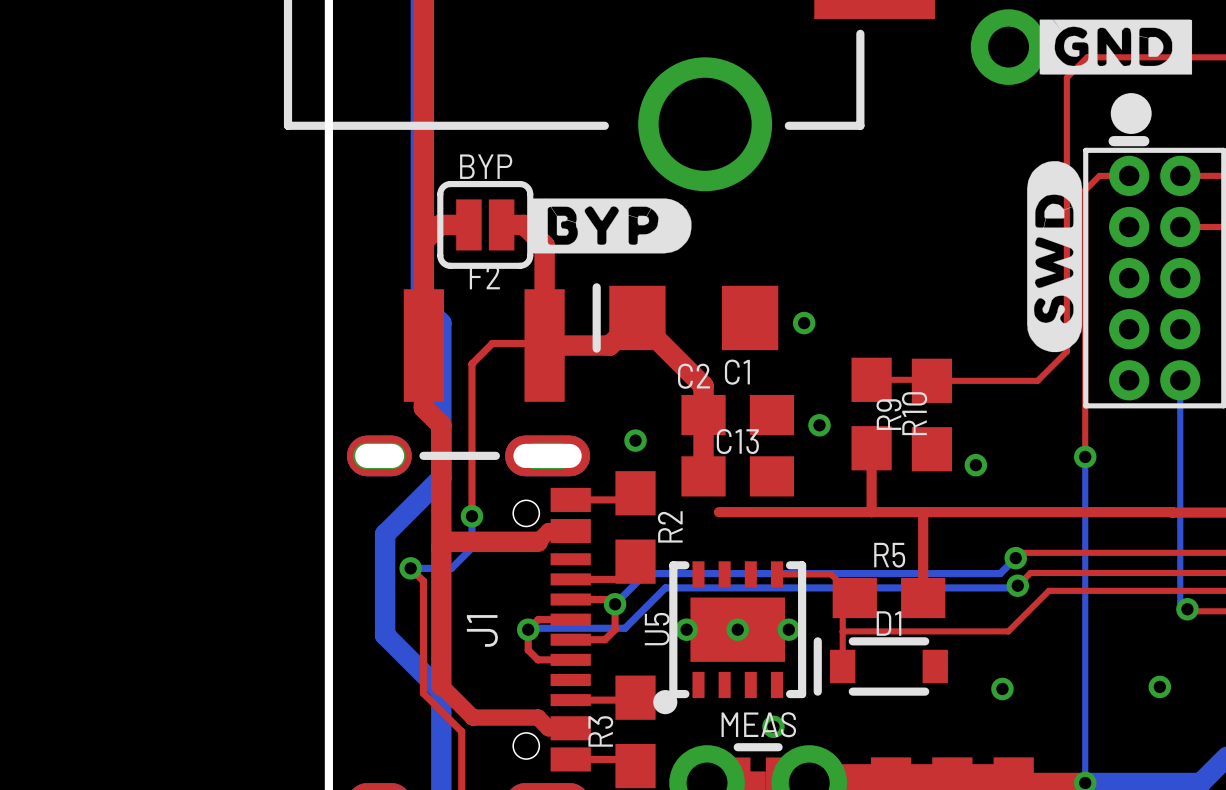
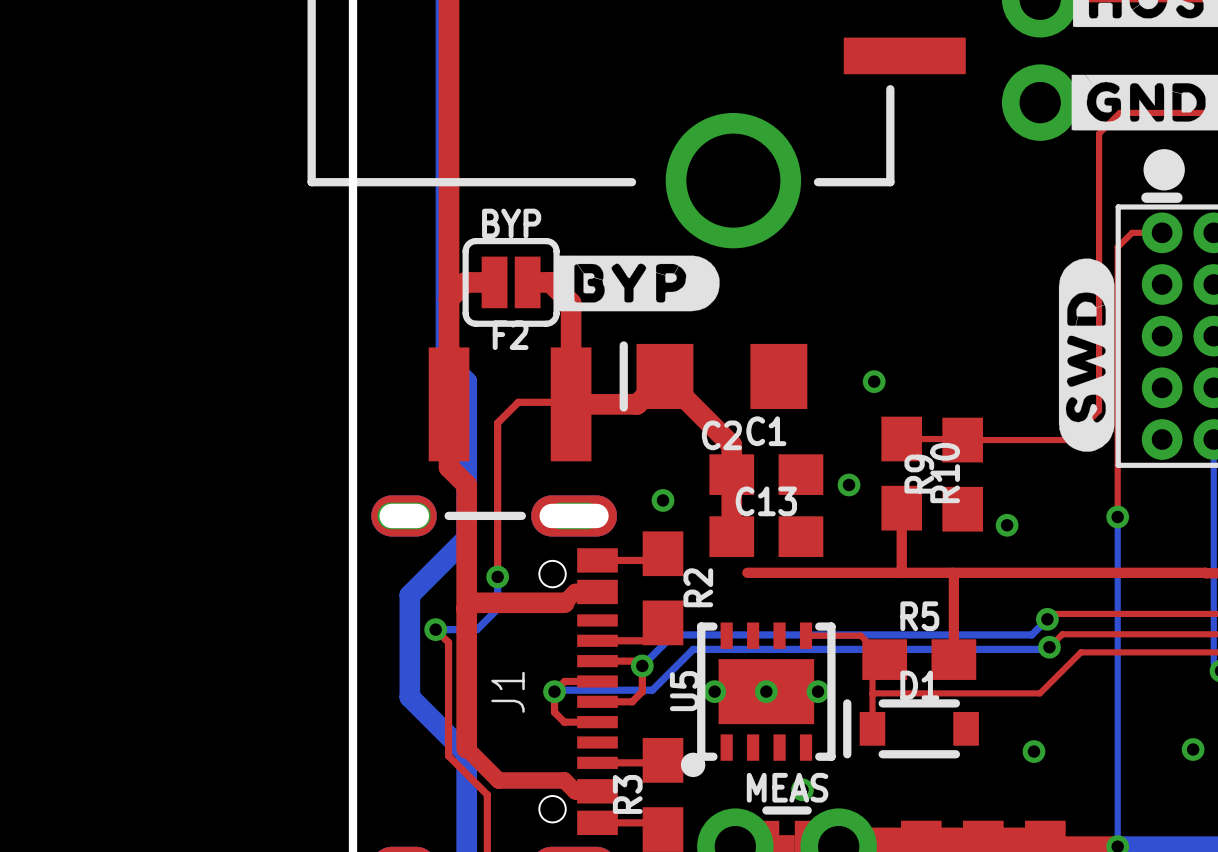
drawing position: (1054, 256) -> (1086, 355)
via position: (804, 323) -> (874, 381)

